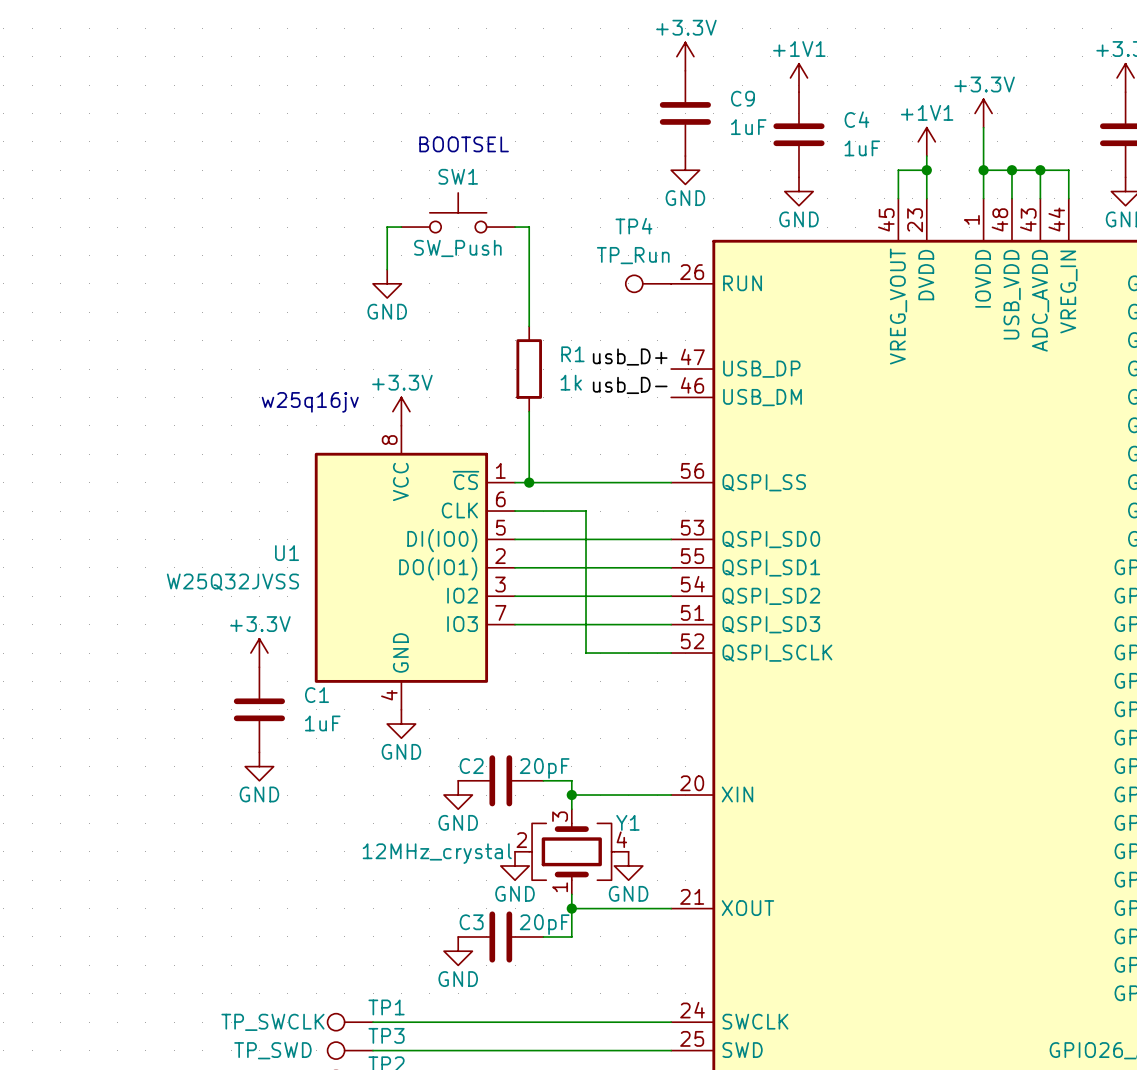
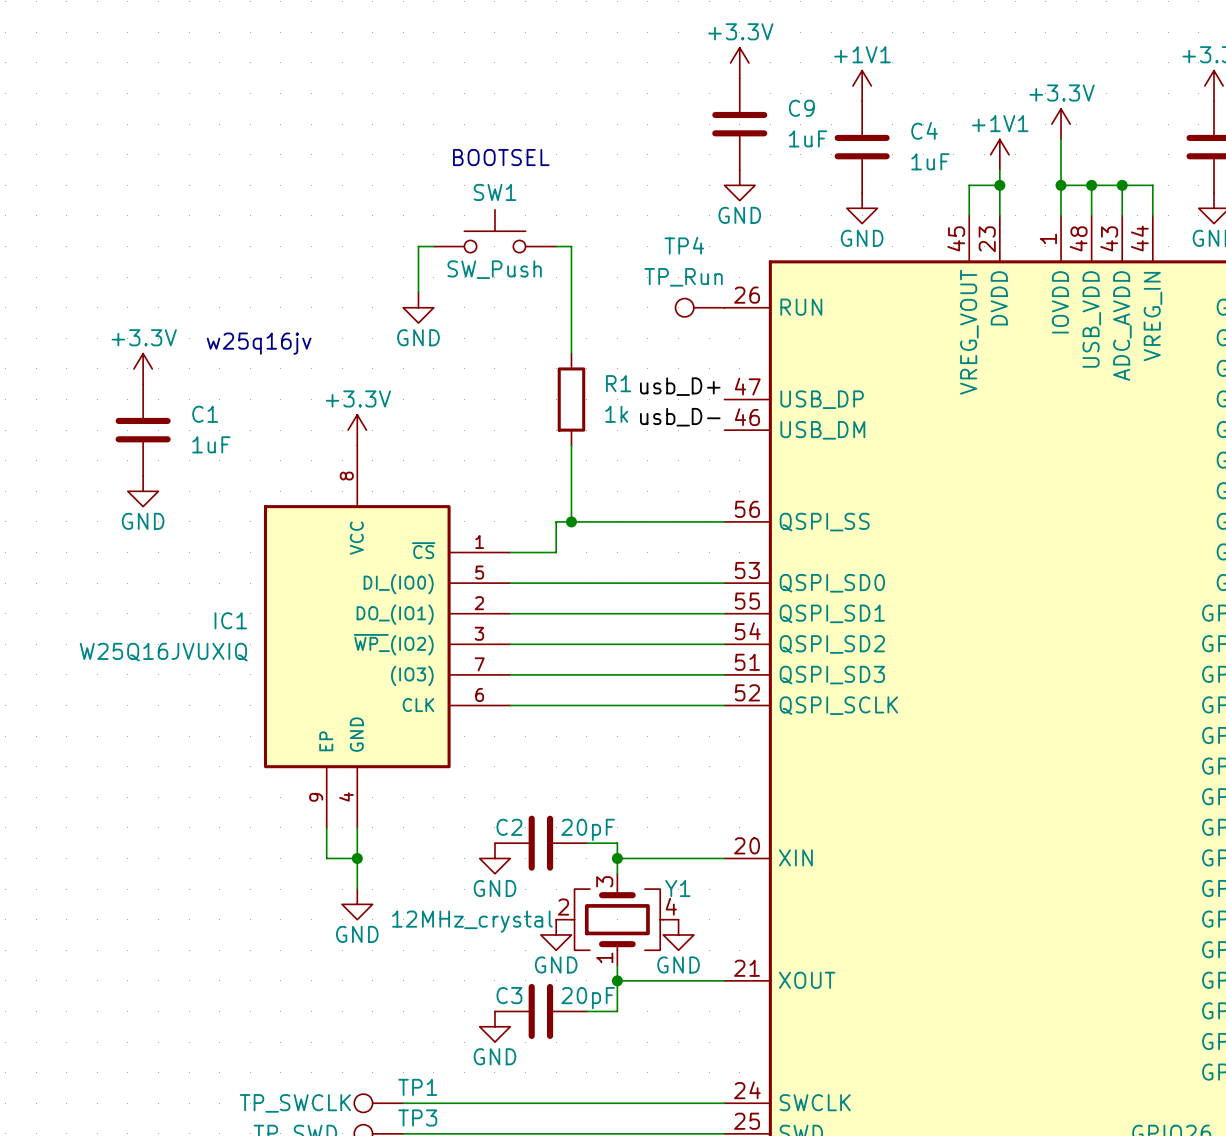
power symbol: none -> +3.3V (143, 368)
text position: w25q16jv (310, 402) -> w25q16jv (259, 343)
power symbol position: +3.3V (401, 411) -> +3.3V (357, 430)
power symbol: none -> GND (143, 491)
wire: none -> (556, 521) (556, 552) (510, 552)
wire: (515, 511) (586, 511) (586, 653) -> (510, 705) (632, 705)
U1: W25Q32JVSS (414, 567) -> none
IC1: none -> W25Q16JVUXIQ (387, 636)
power symbol: +3.3V (259, 653) -> none
C1 position: (259, 709) -> (143, 430)
power symbol: GND (401, 724) -> none
power symbol: GND (259, 766) -> none
wire: none -> (326, 827) (326, 858) (357, 858)
wire: none -> (357, 827) (357, 889)
junction: none -> (357, 858)
power symbol: none -> GND (357, 904)

